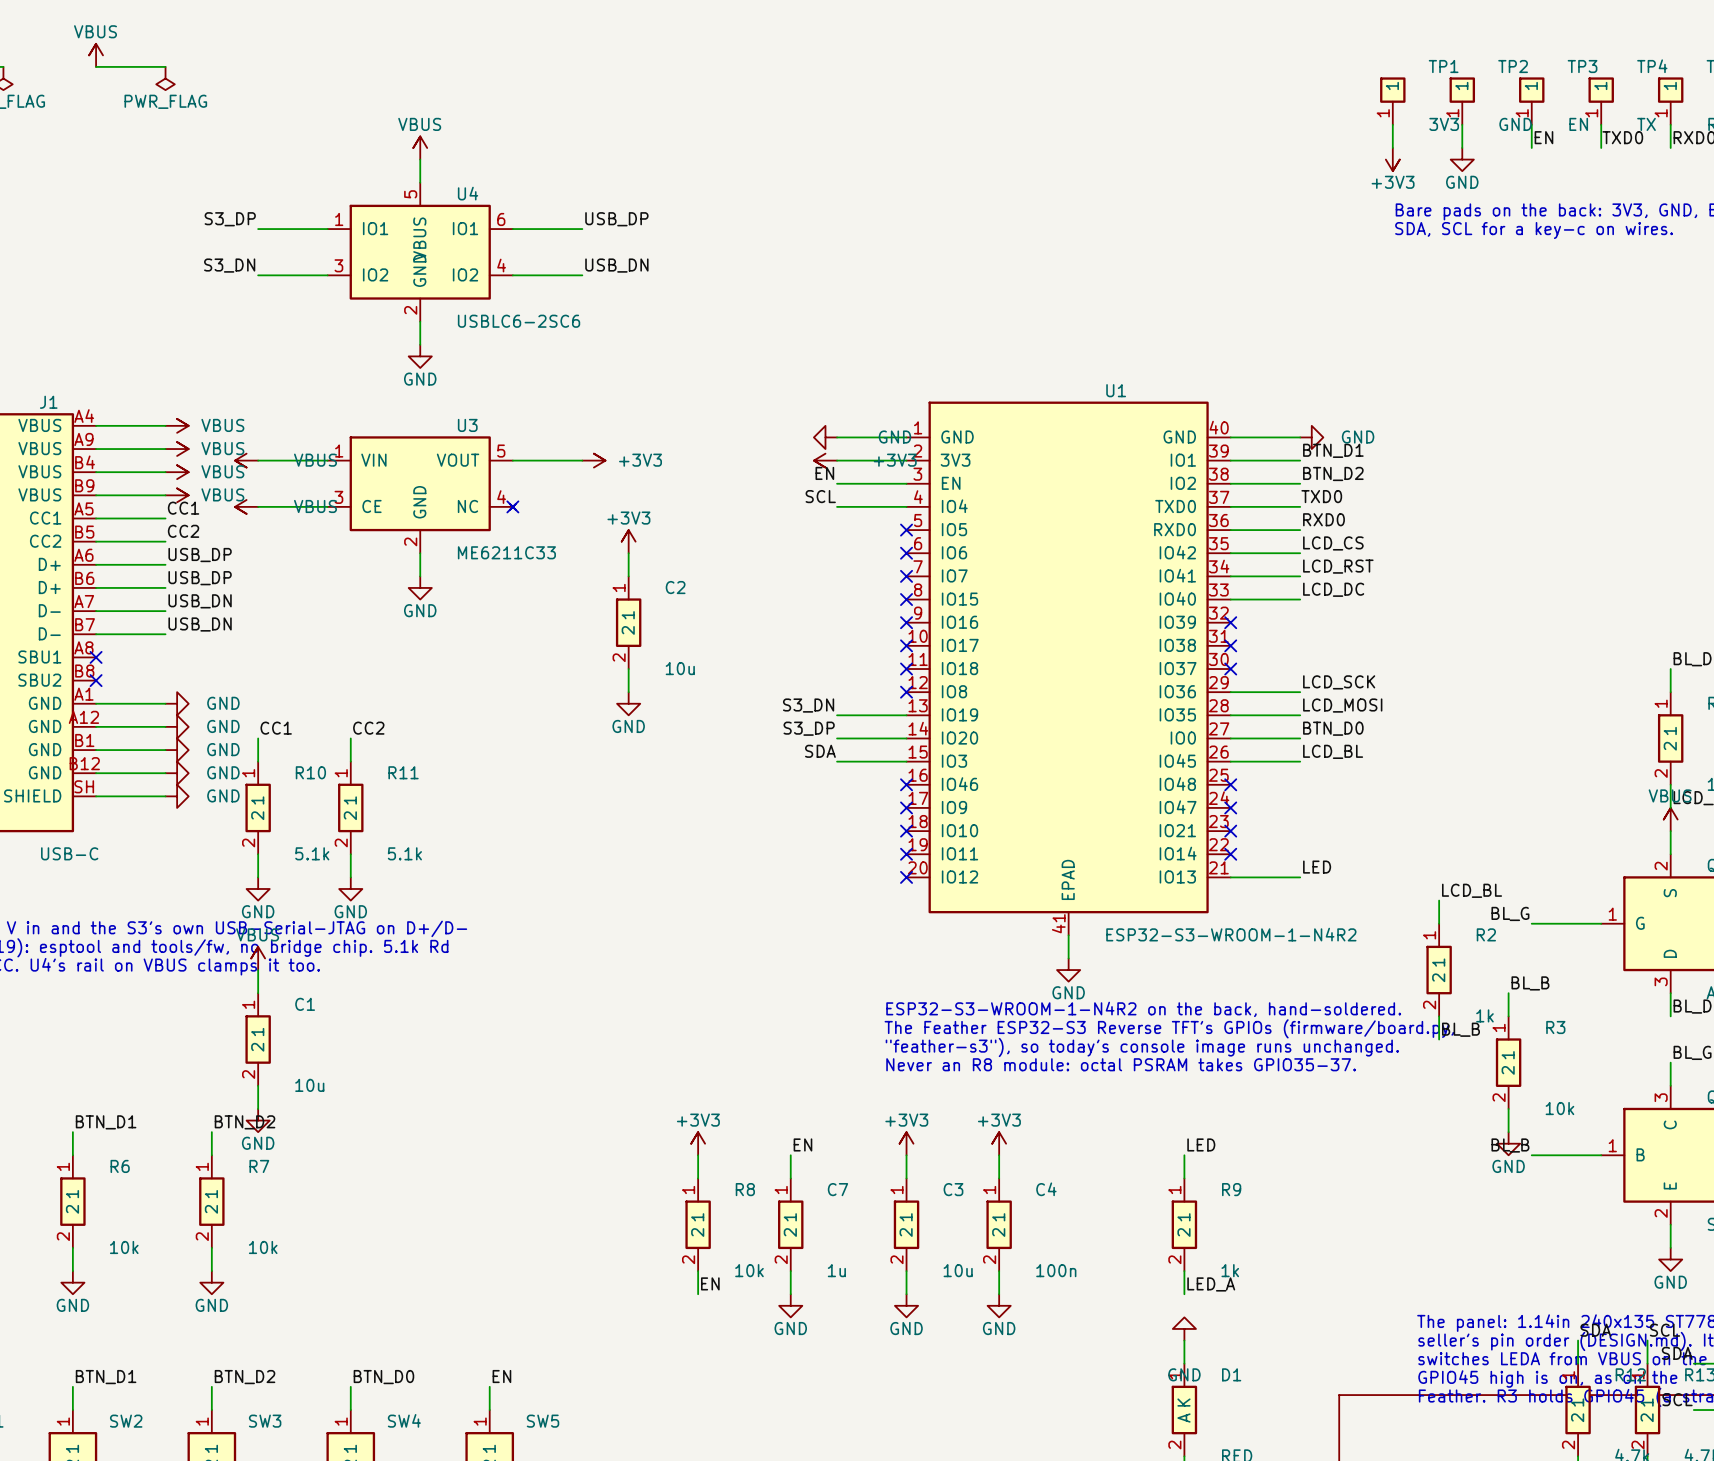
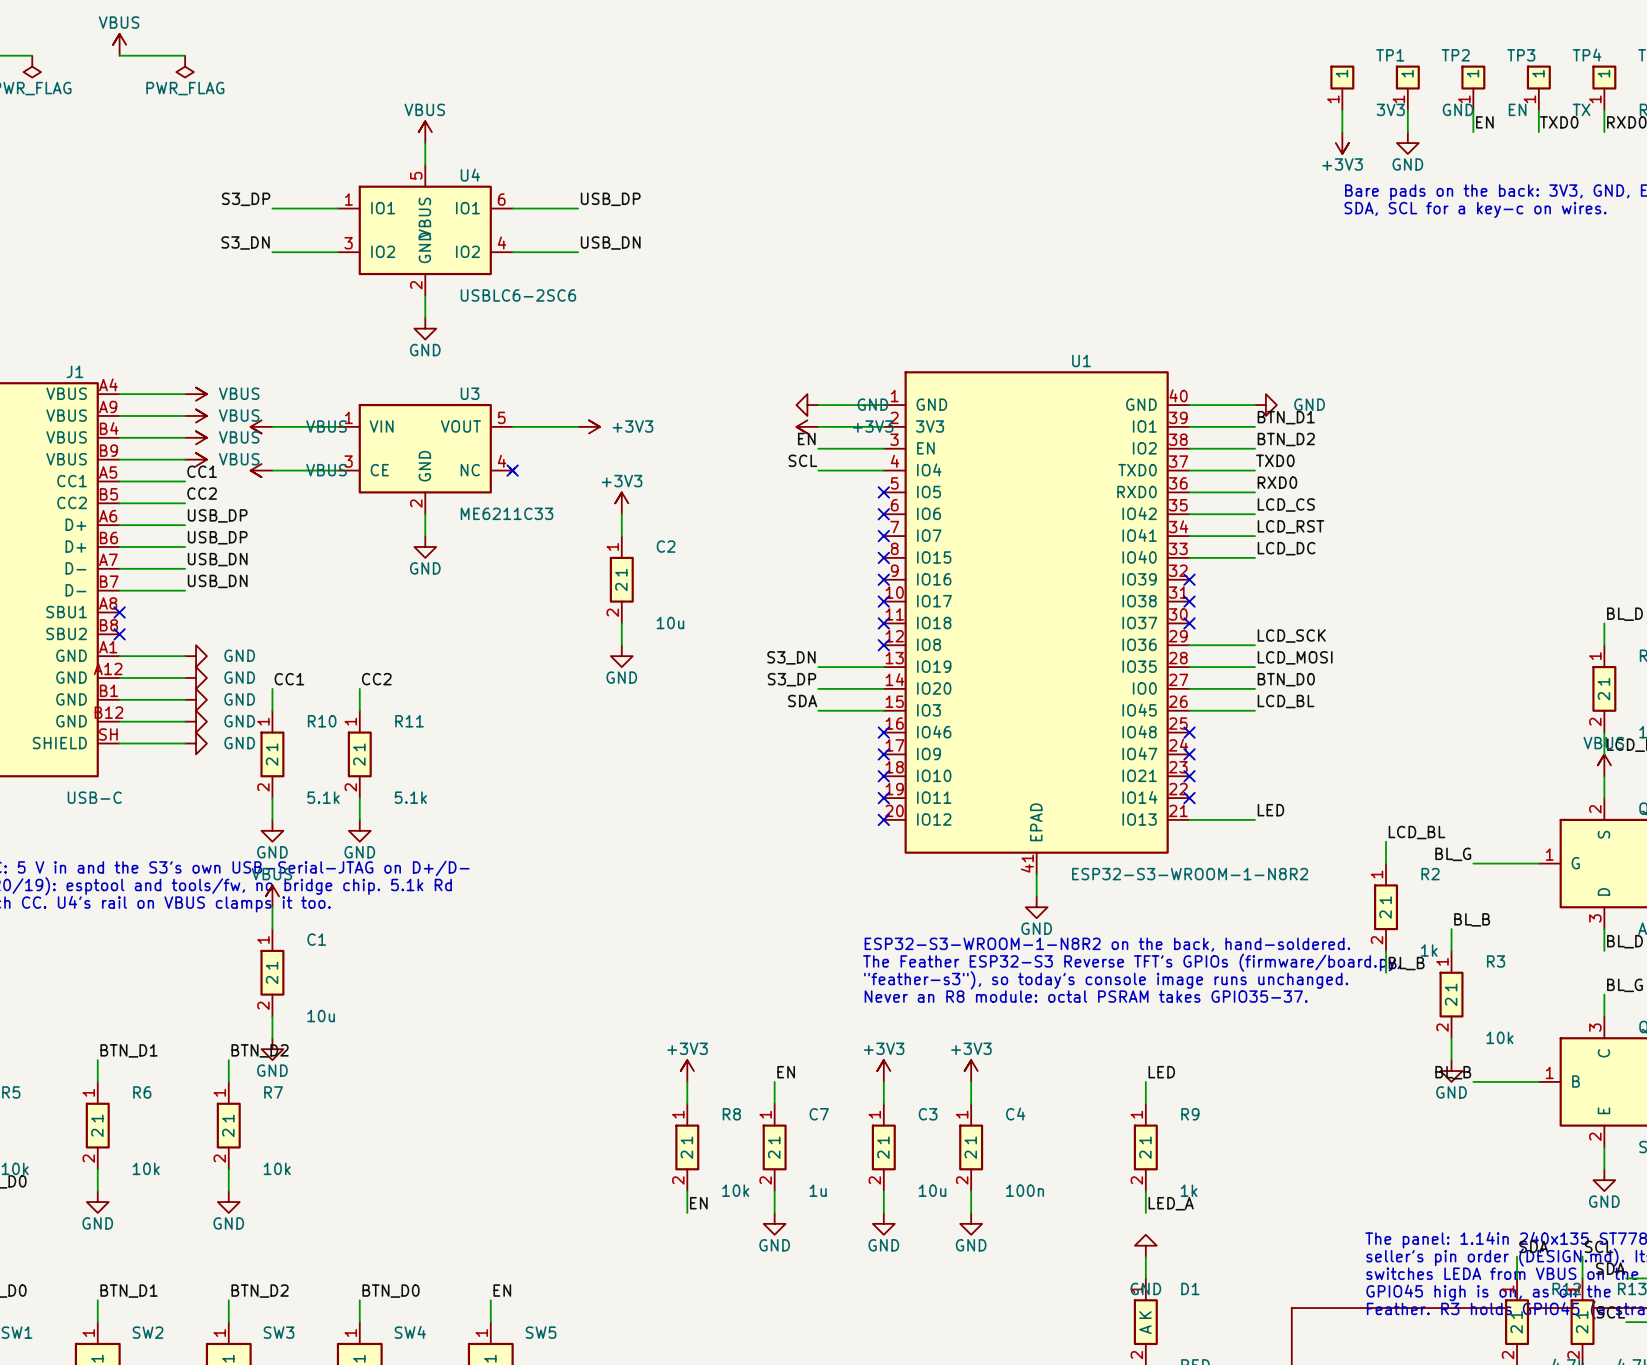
U1 value: ESP32-S3-WROOM-1-N4R2 (1231, 934) -> ESP32-S3-WROOM-1-N8R2 (1190, 874)
text: ESP32-S3-WROOM-1-N4R2 on the back, hand-soldered. (1143, 1009) -> ESP32-S3-WROOM-1-N8R2 on the back, hand-soldered. (1107, 944)

